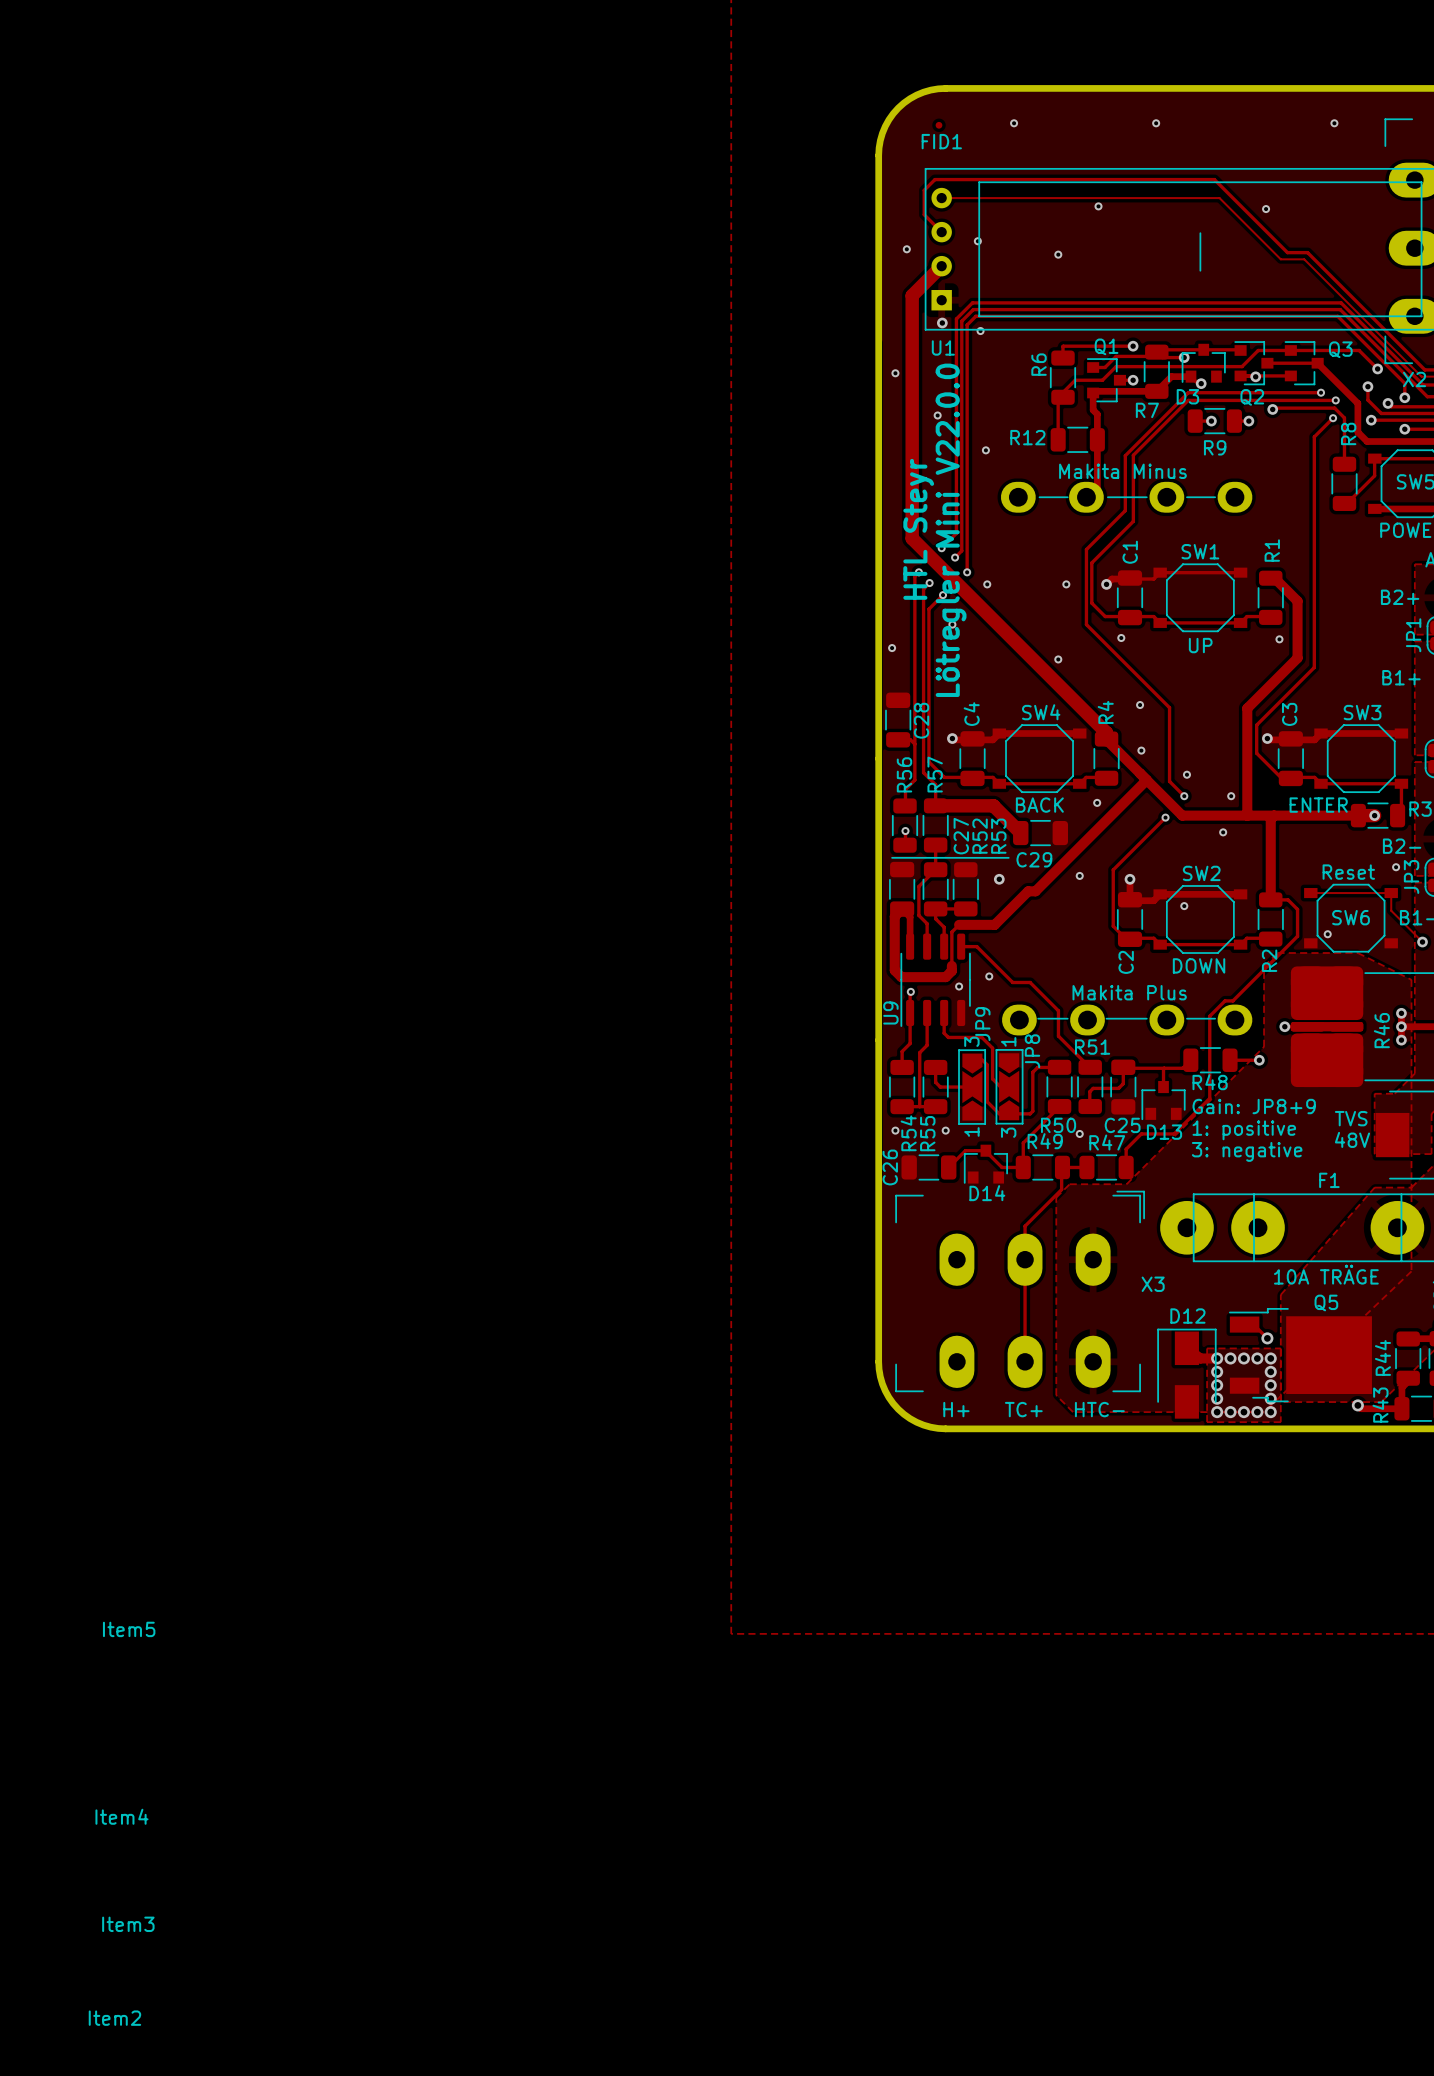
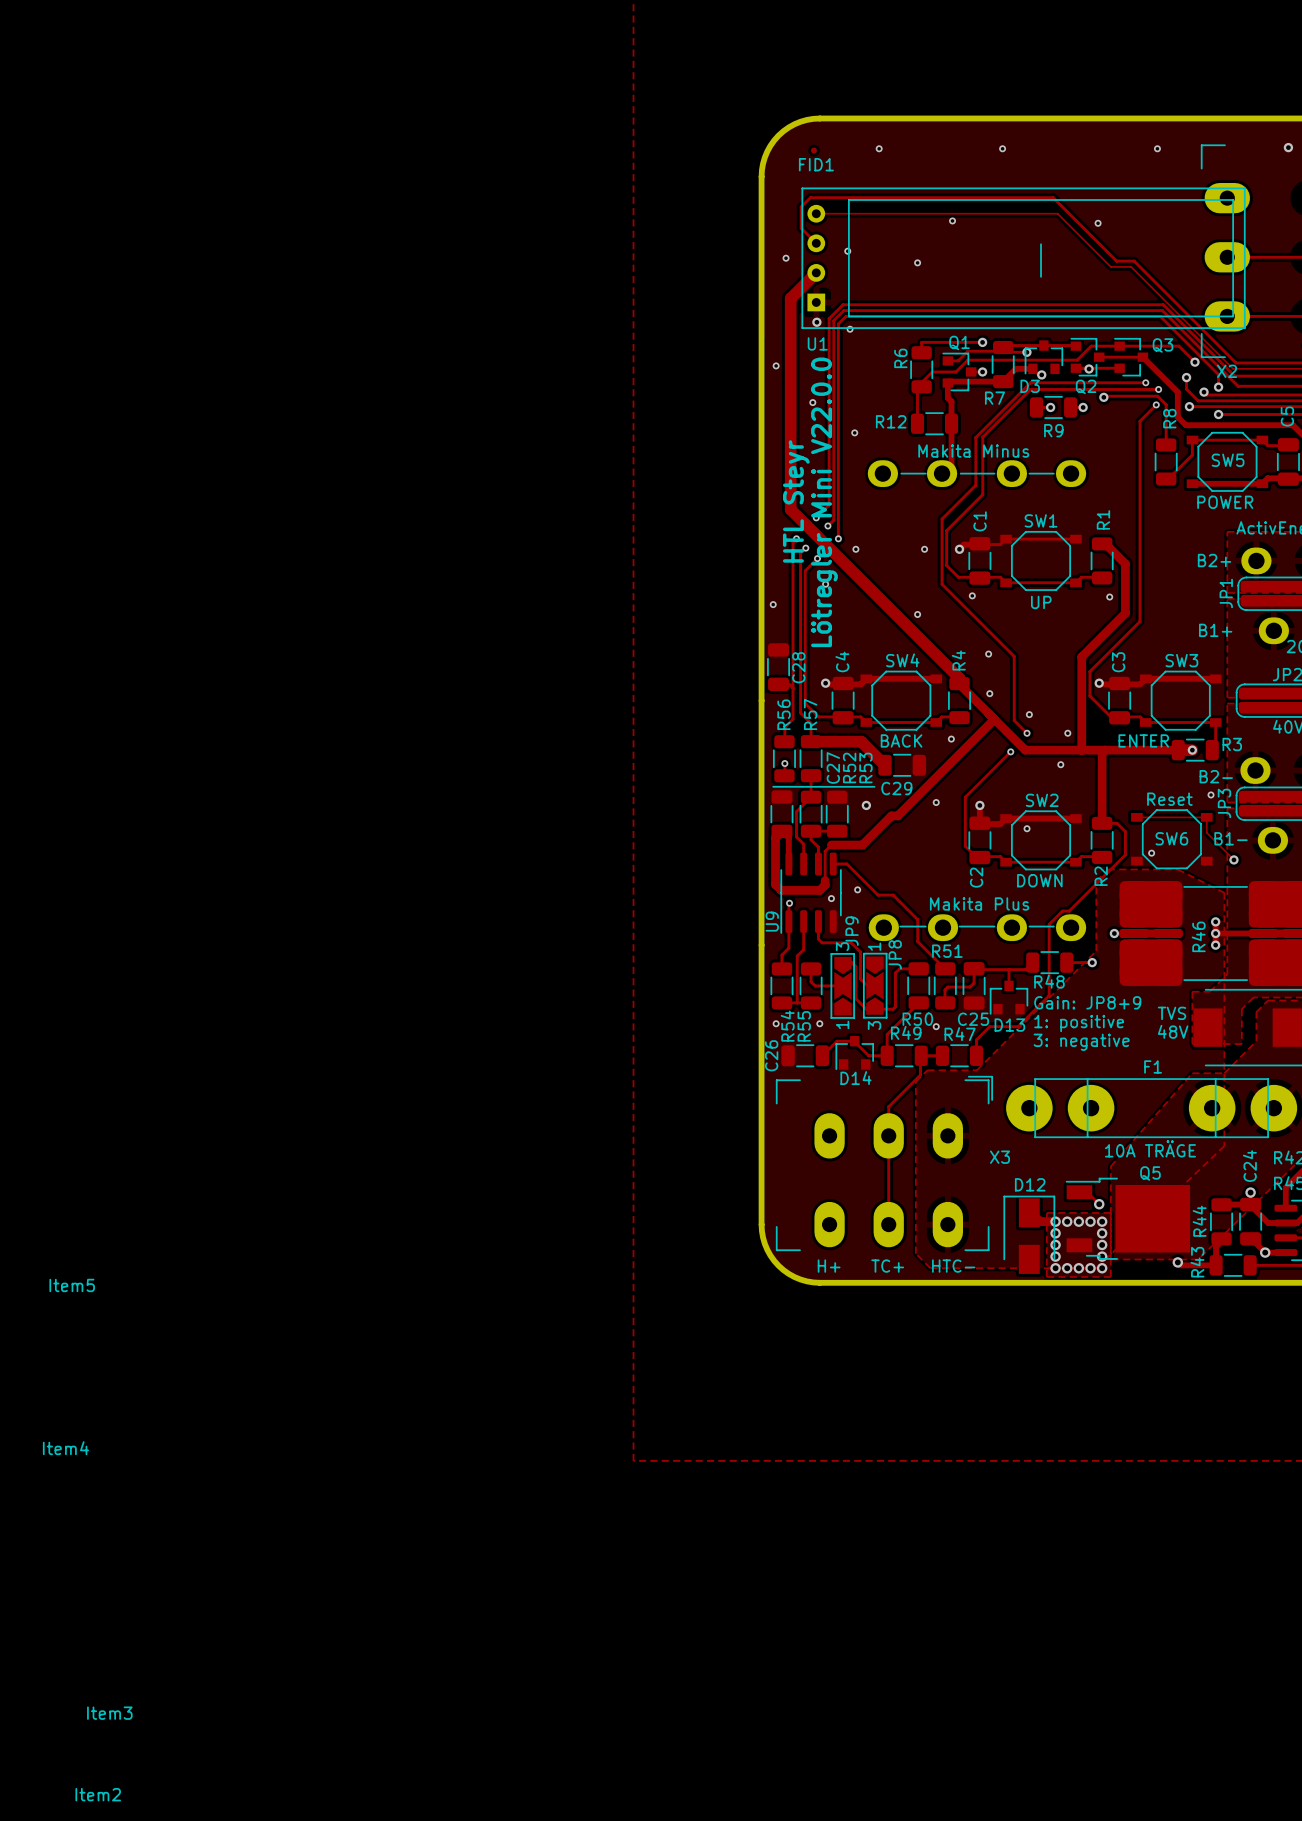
Item5 position: (129, 1629) -> (72, 1285)
Item4 position: (121, 1816) -> (65, 1448)

